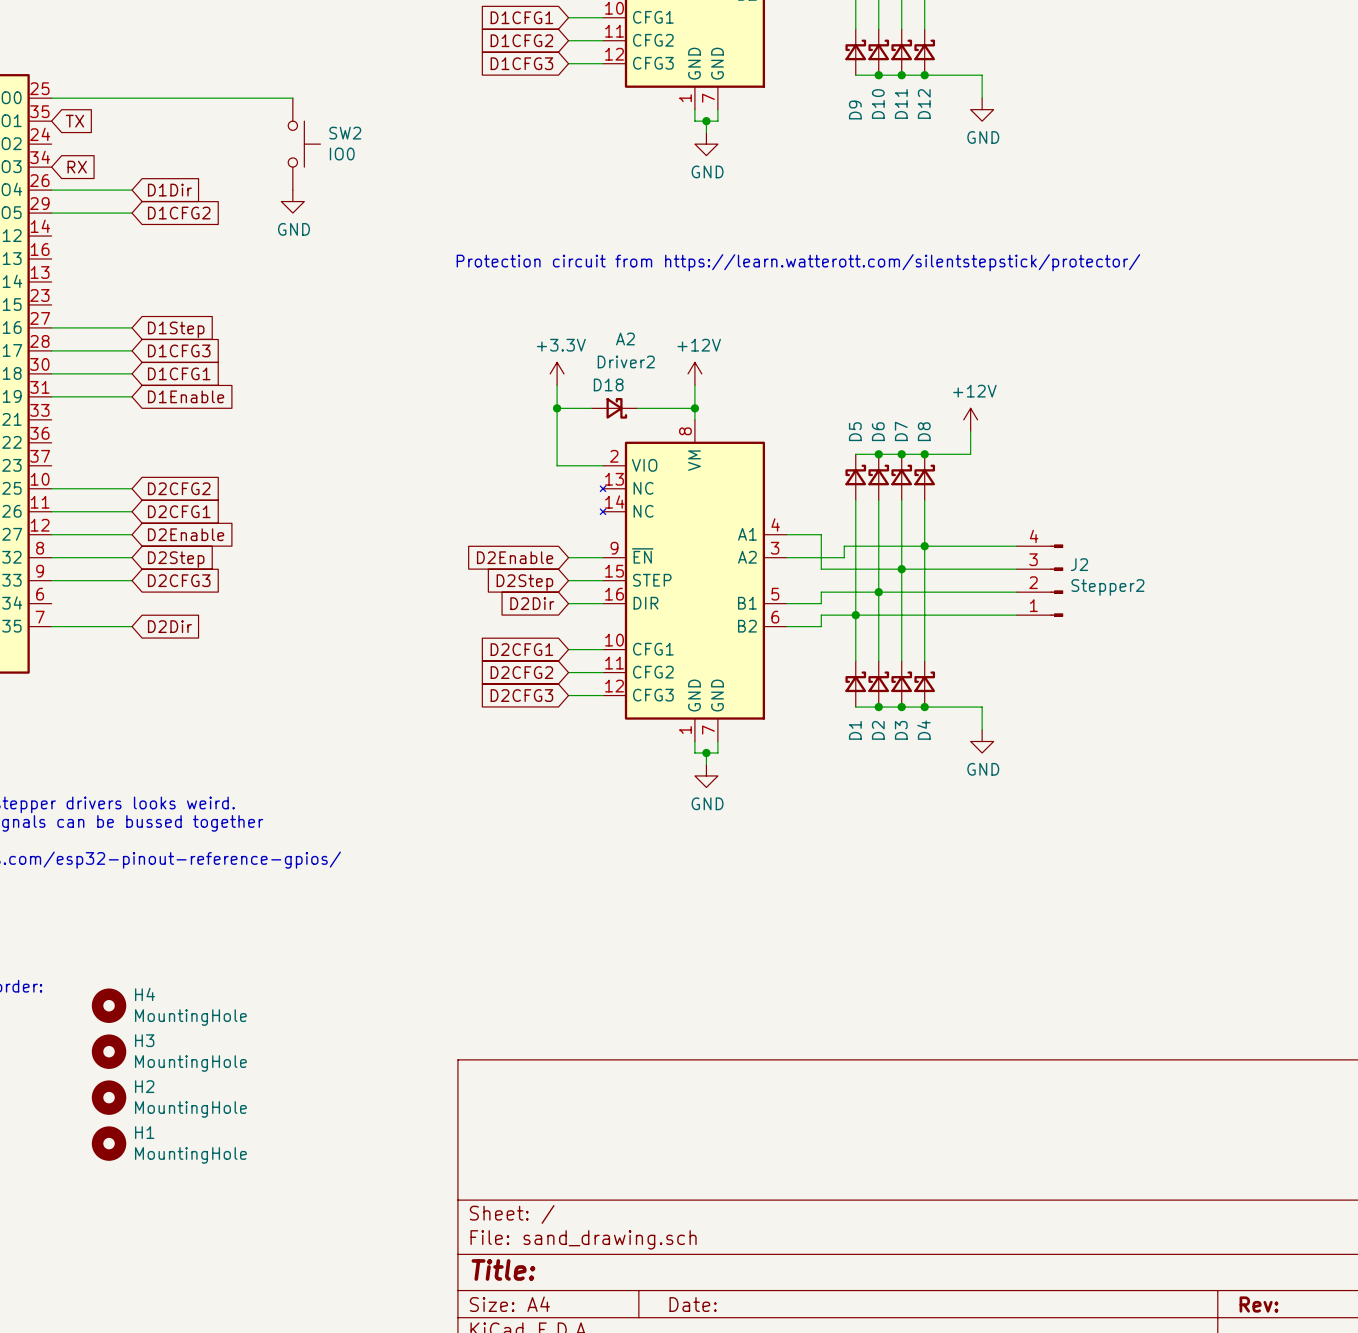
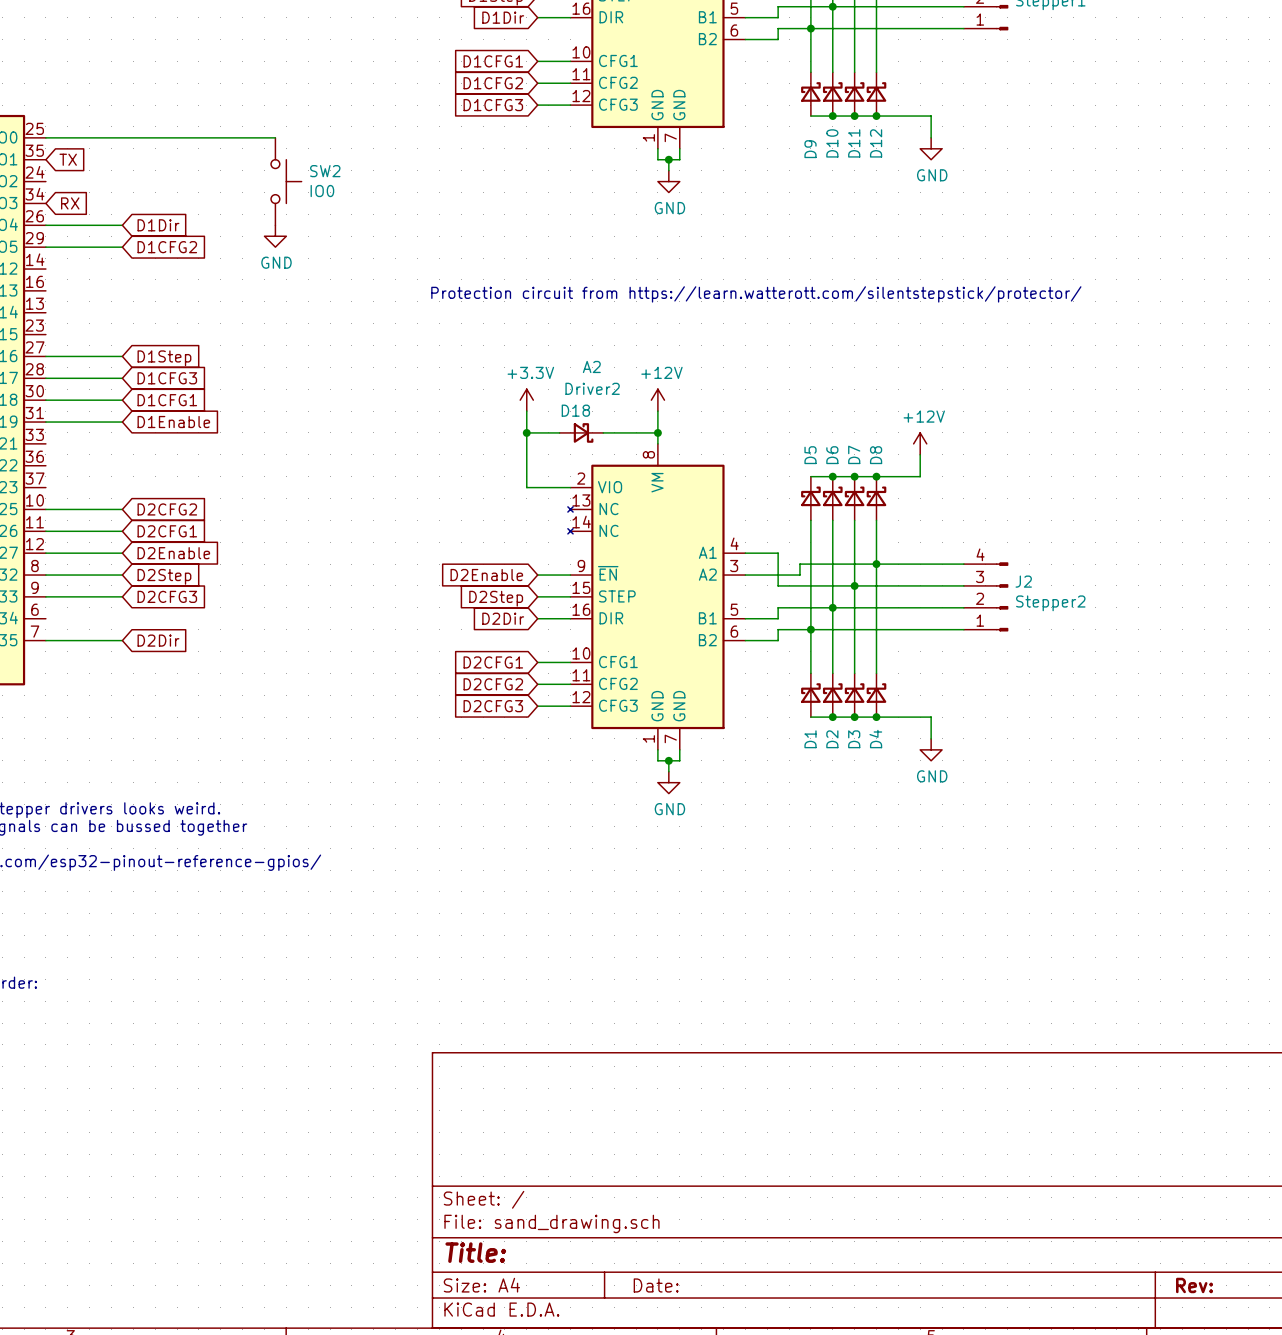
H4: MountingHole (109, 1005) -> none
H3: MountingHole (109, 1051) -> none
H2: MountingHole (109, 1097) -> none
H1: MountingHole (109, 1143) -> none

